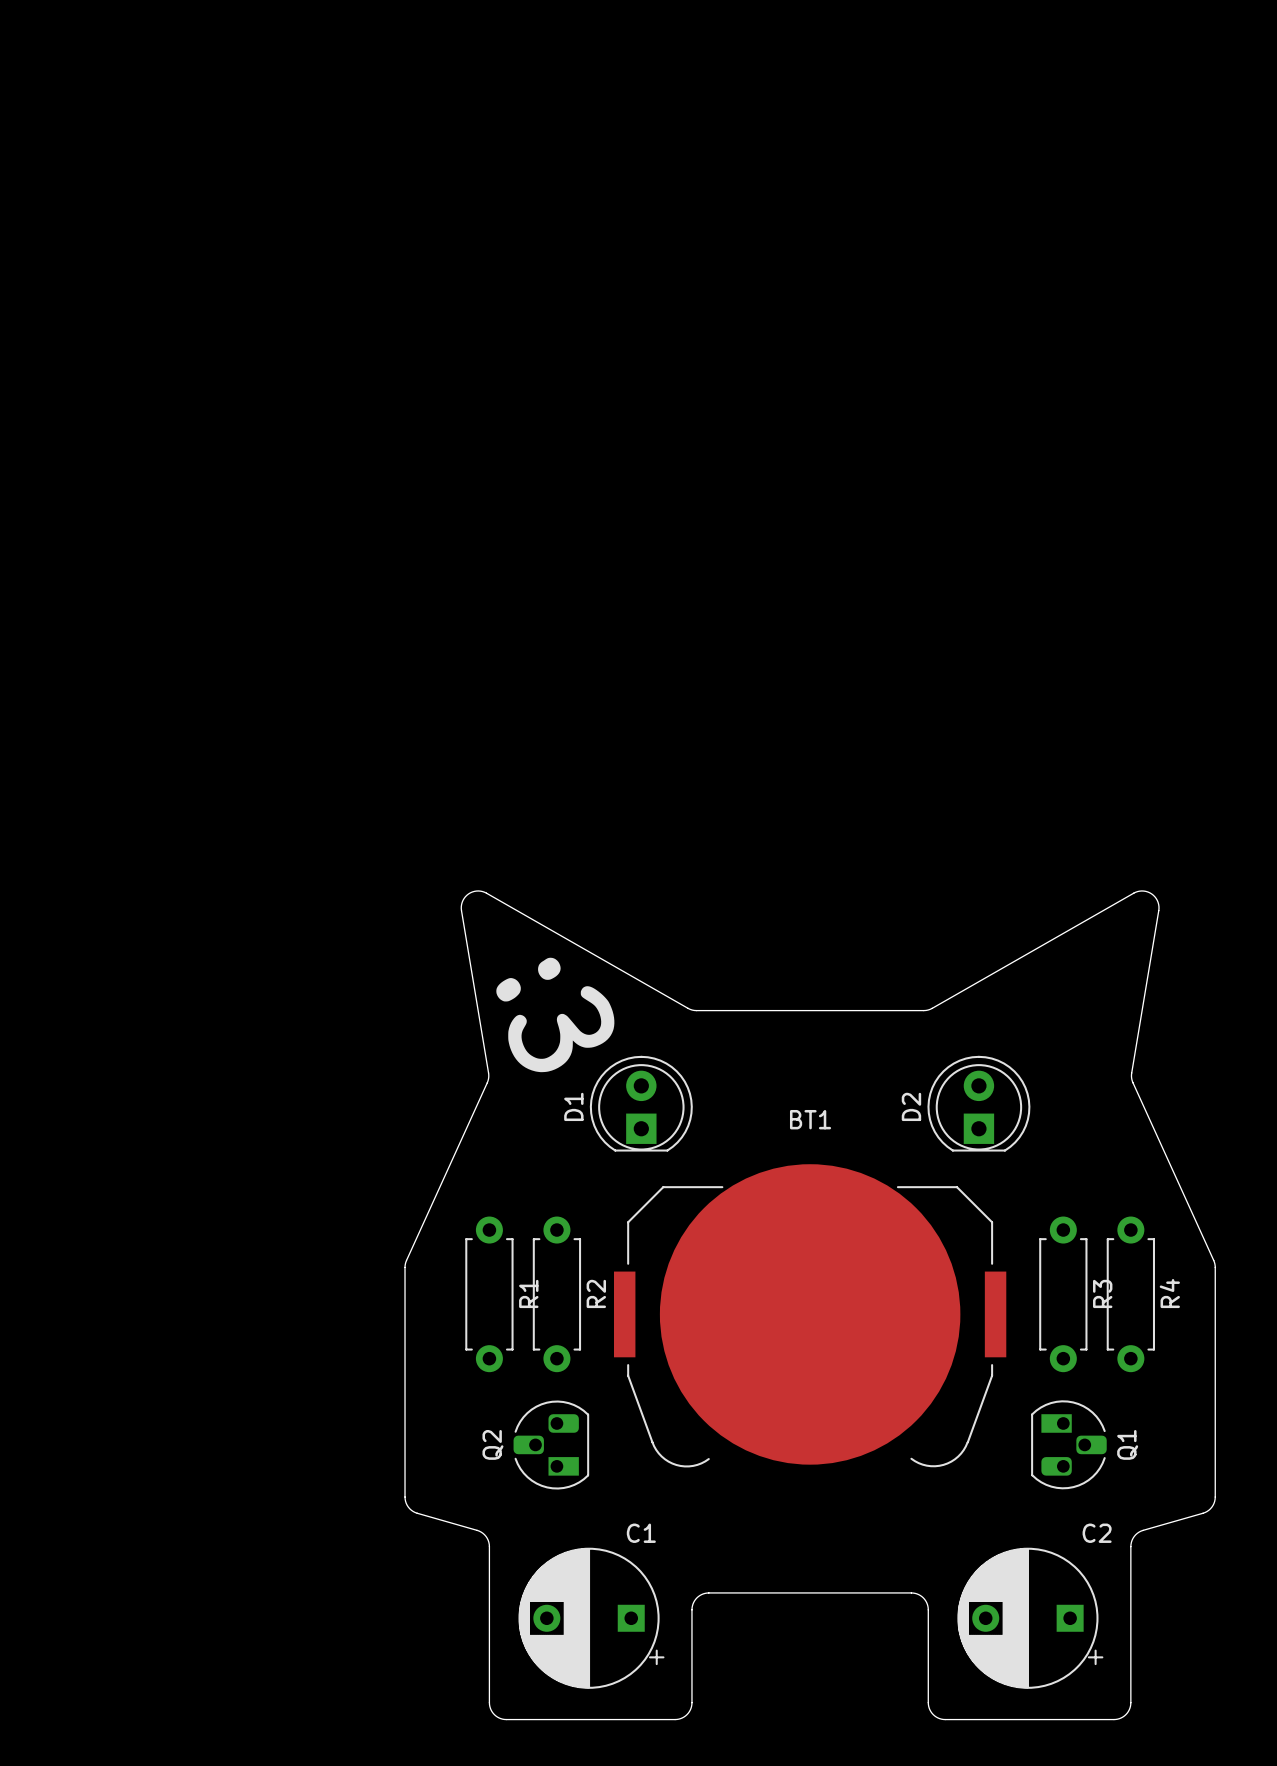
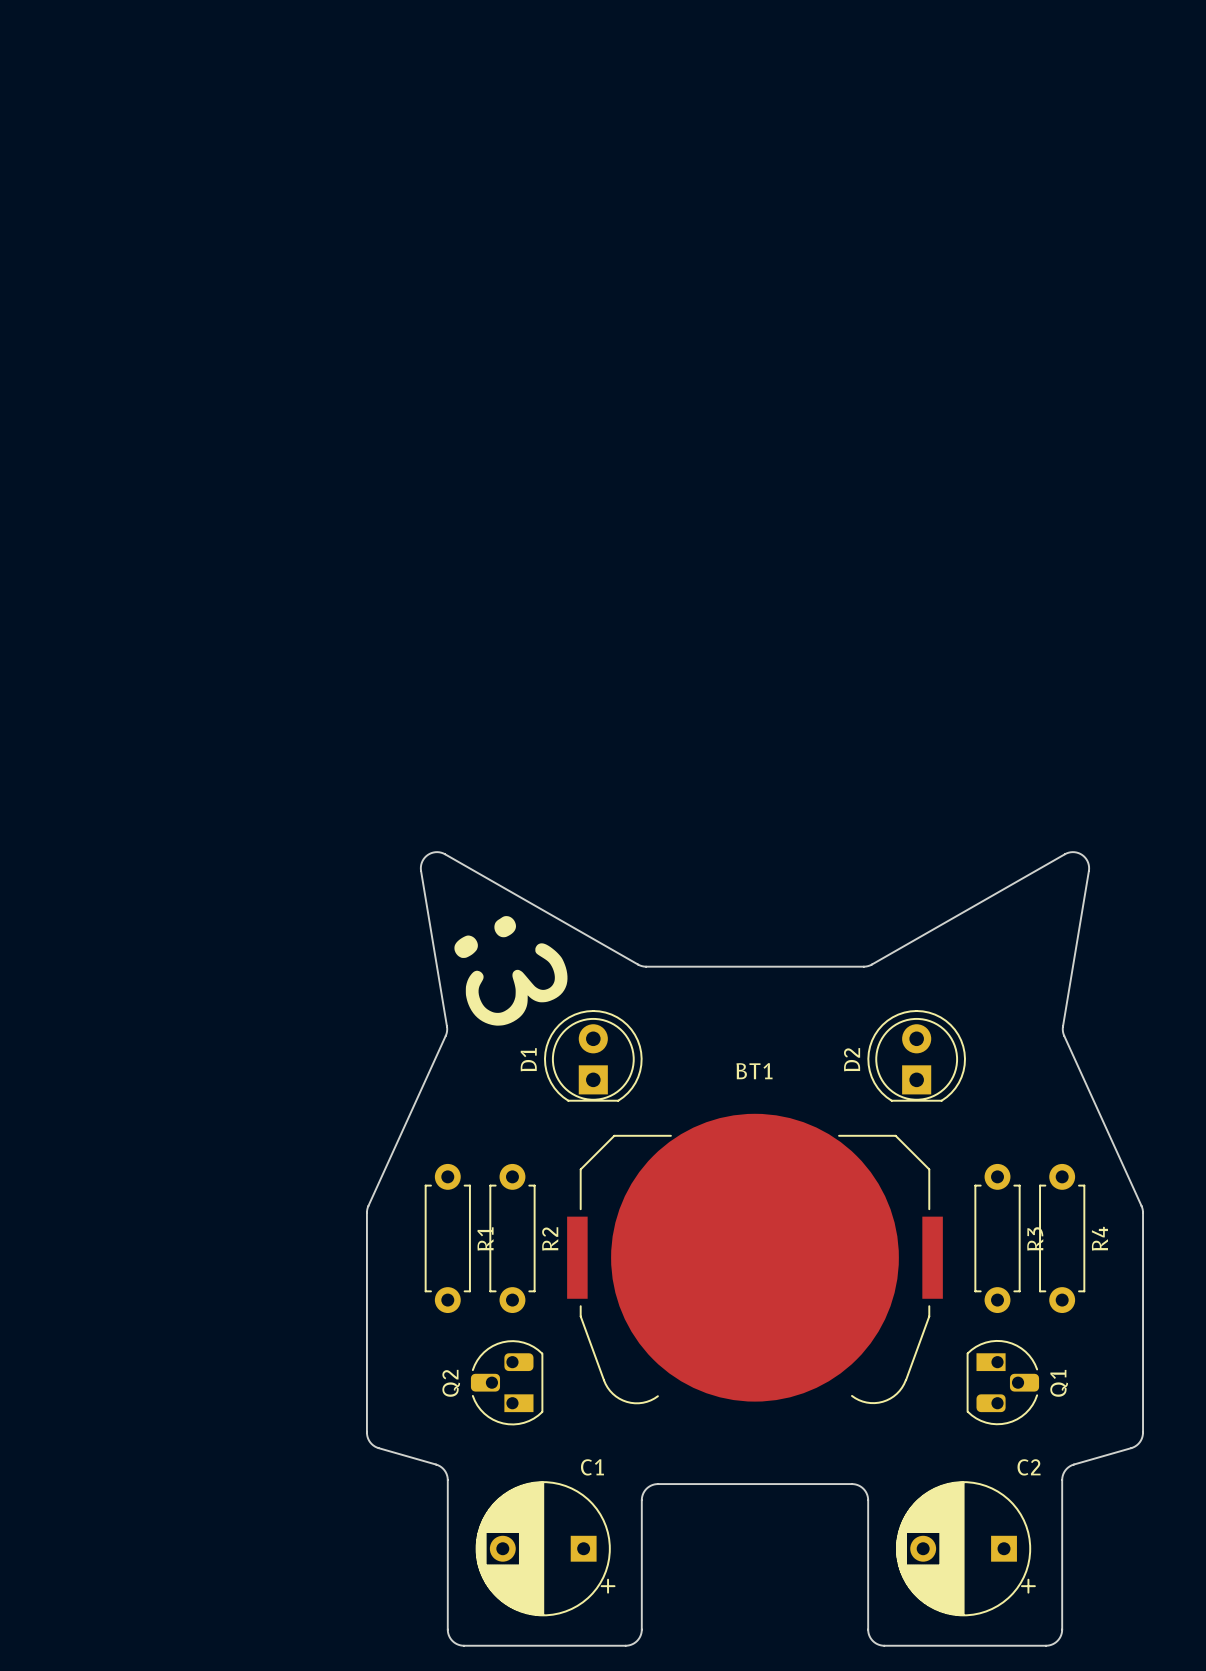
board edge: (691, 1609) (696, 1597) (708, 1592) (913, 1593) (924, 1599) (928, 1609) -> (641, 1540) (642, 1496) (647, 1487) (657, 1484) (855, 1484) (863, 1488) (867, 1496) (868, 1540)

